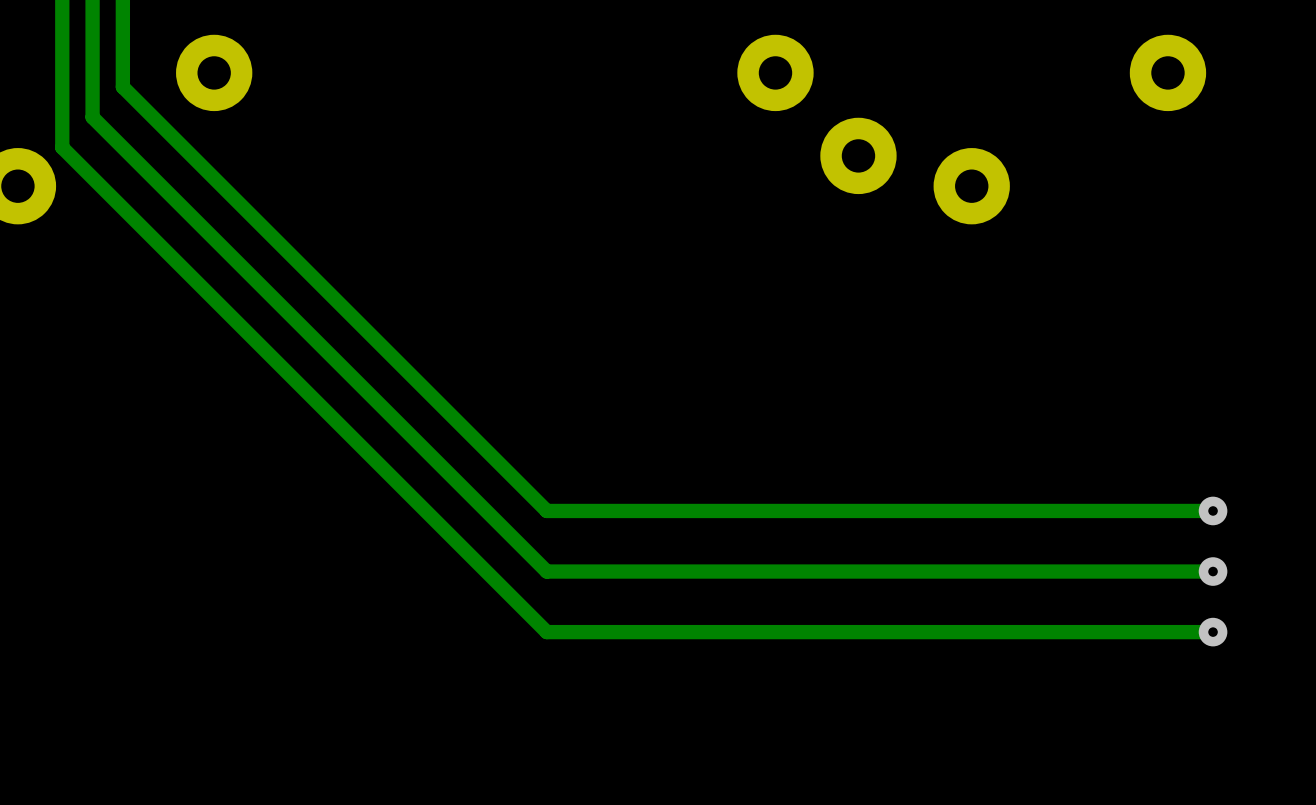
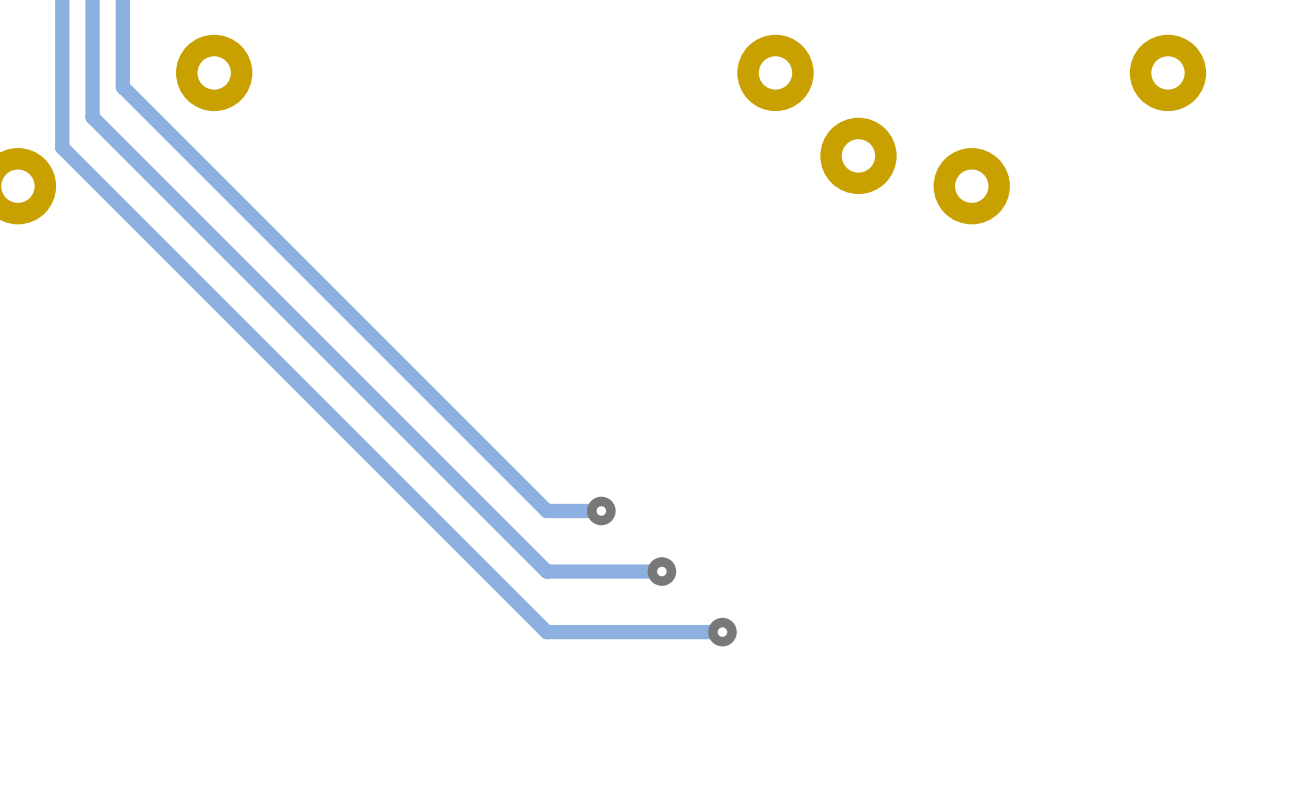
via: none -> (601, 510)
track: (1213, 510) (601, 510) -> none
via: (1213, 510) -> none
via: none -> (661, 571)
track: (1213, 571) (661, 571) -> none
via: (1213, 571) -> none
via: none -> (722, 632)
track: (1213, 632) (722, 632) -> none
via: (1213, 632) -> none

